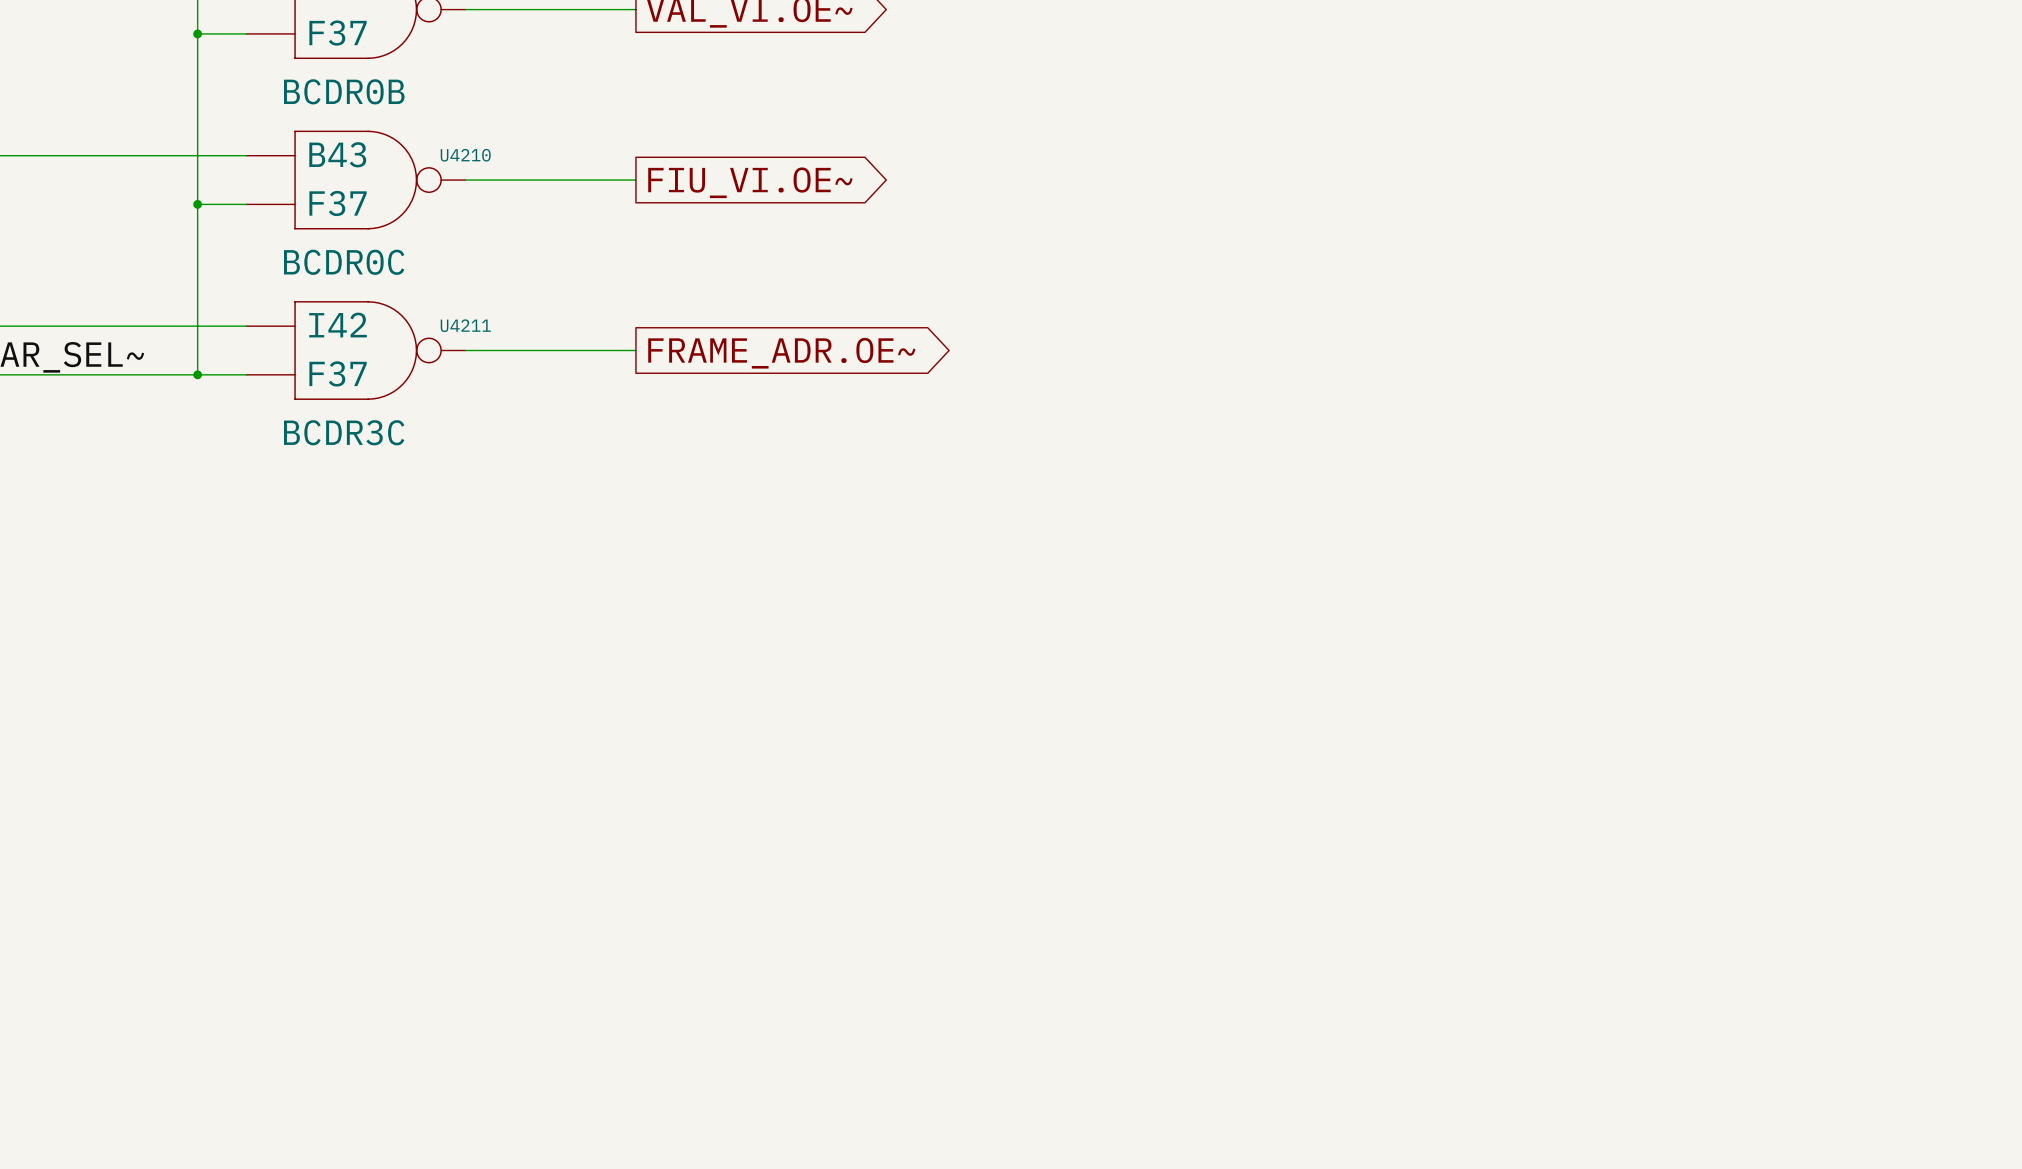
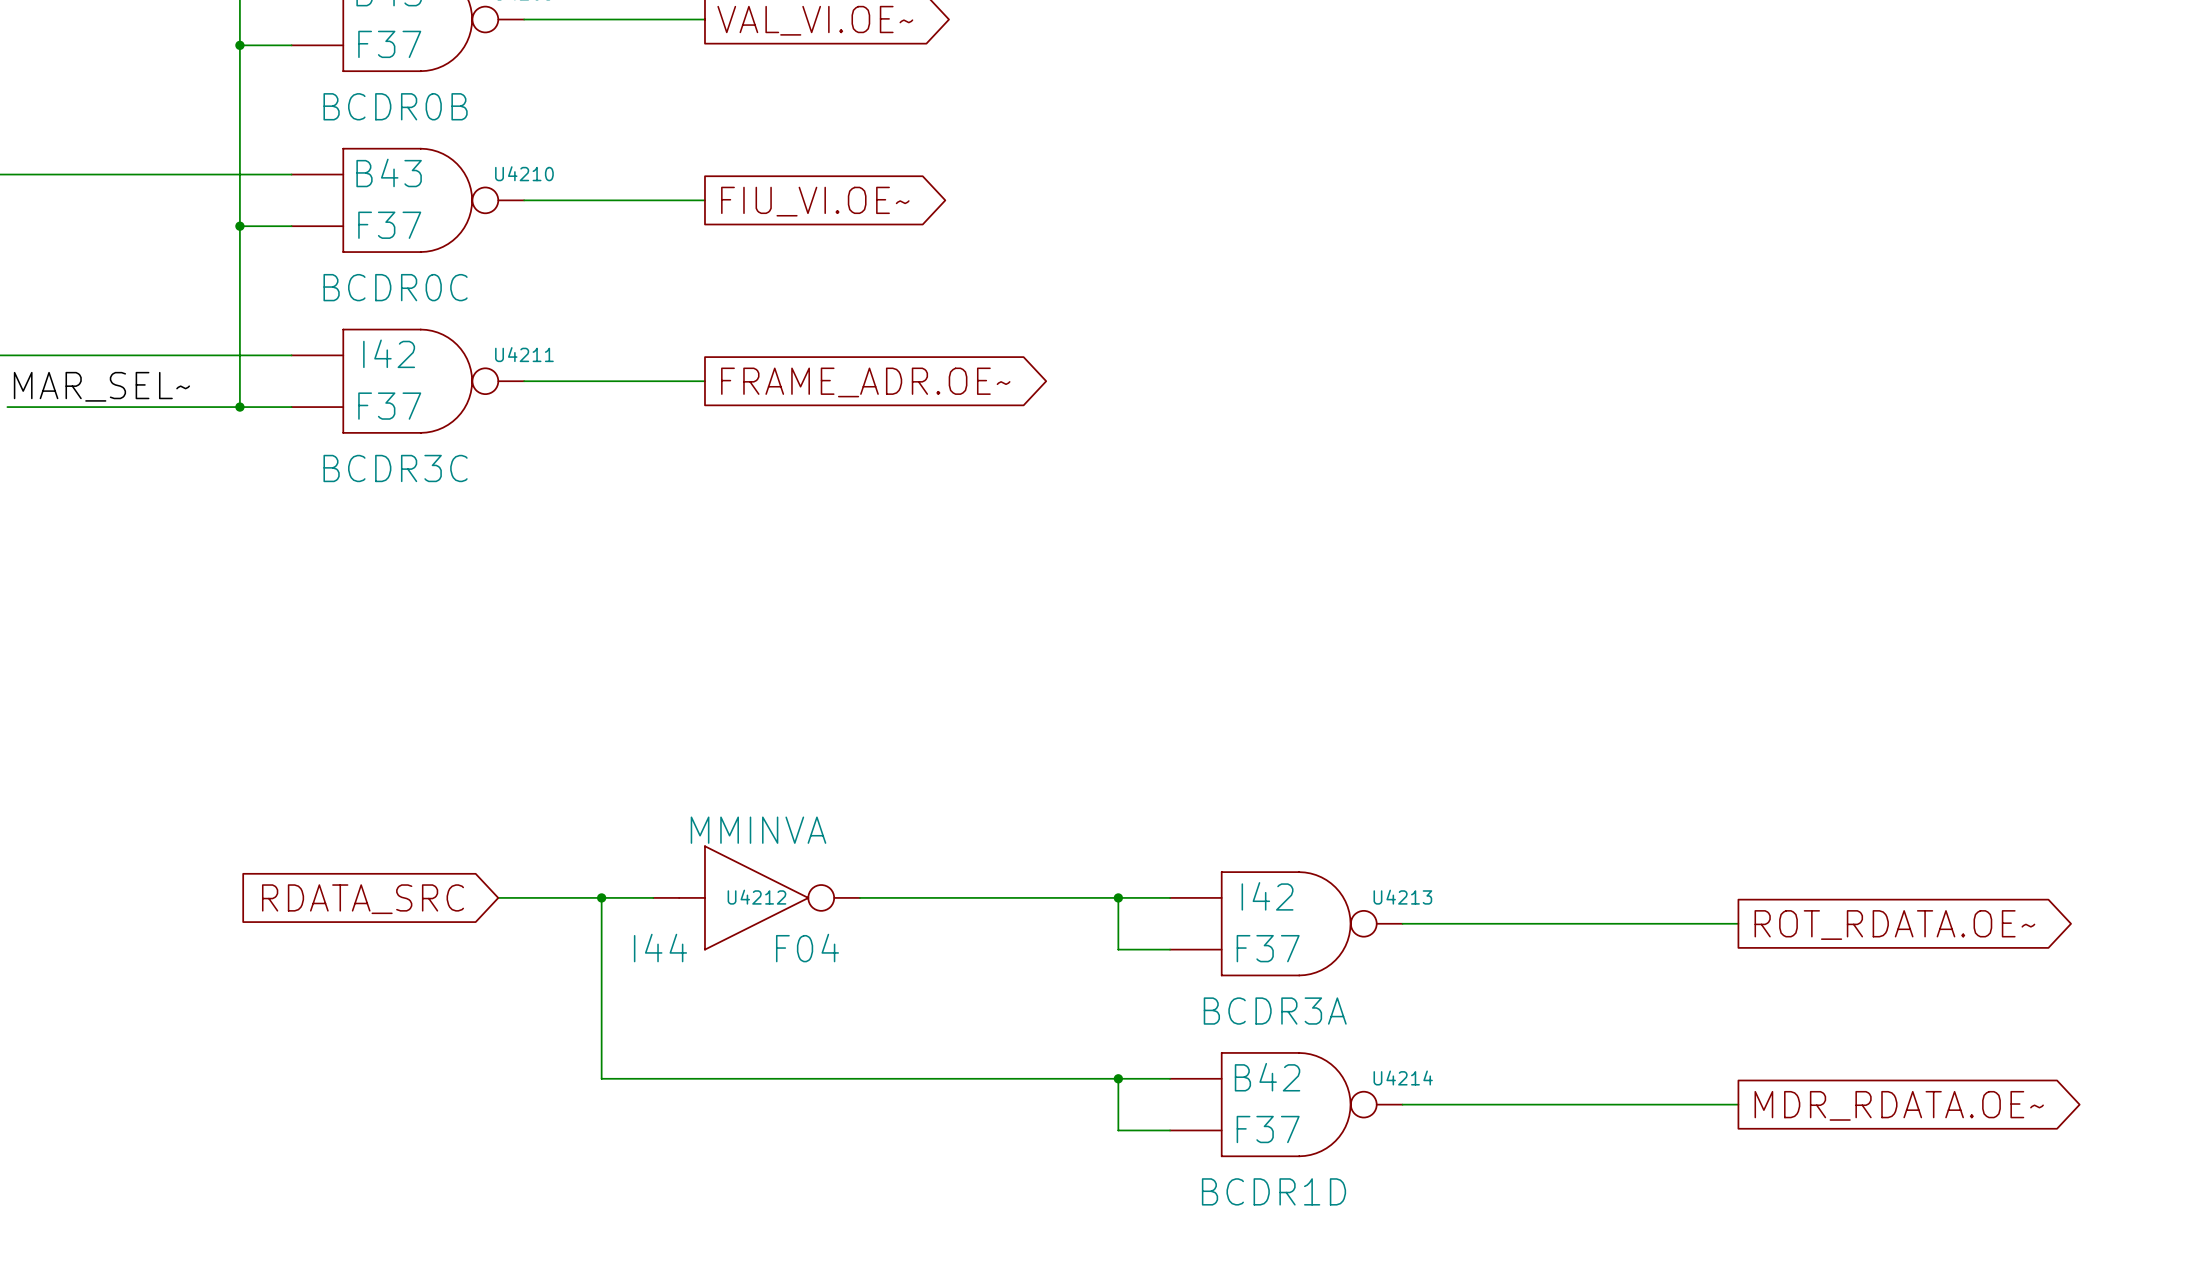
wire: none -> (498, 897) (653, 897)
wire: none -> (601, 897) (601, 1078) (1170, 1078)
junction: none -> (601, 897)
U4212: none -> F04 (756, 897)
wire: none -> (860, 897) (1170, 897)
wire: none -> (1118, 897) (1118, 949) (1170, 949)
junction: none -> (1118, 897)
global label: none -> RDATA_SRC (363, 899)
U4213: none -> F37 (1286, 923)
wire: none -> (1402, 923) (1738, 923)
global label: none -> ROT_RDATA.OE~ (1894, 925)
wire: none -> (1118, 1078) (1118, 1130) (1170, 1130)
junction: none -> (1118, 1078)
U4214: none -> F37 (1286, 1104)
wire: none -> (1402, 1104) (1738, 1104)
global label: none -> MDR_RDATA.OE~ (1899, 1105)

